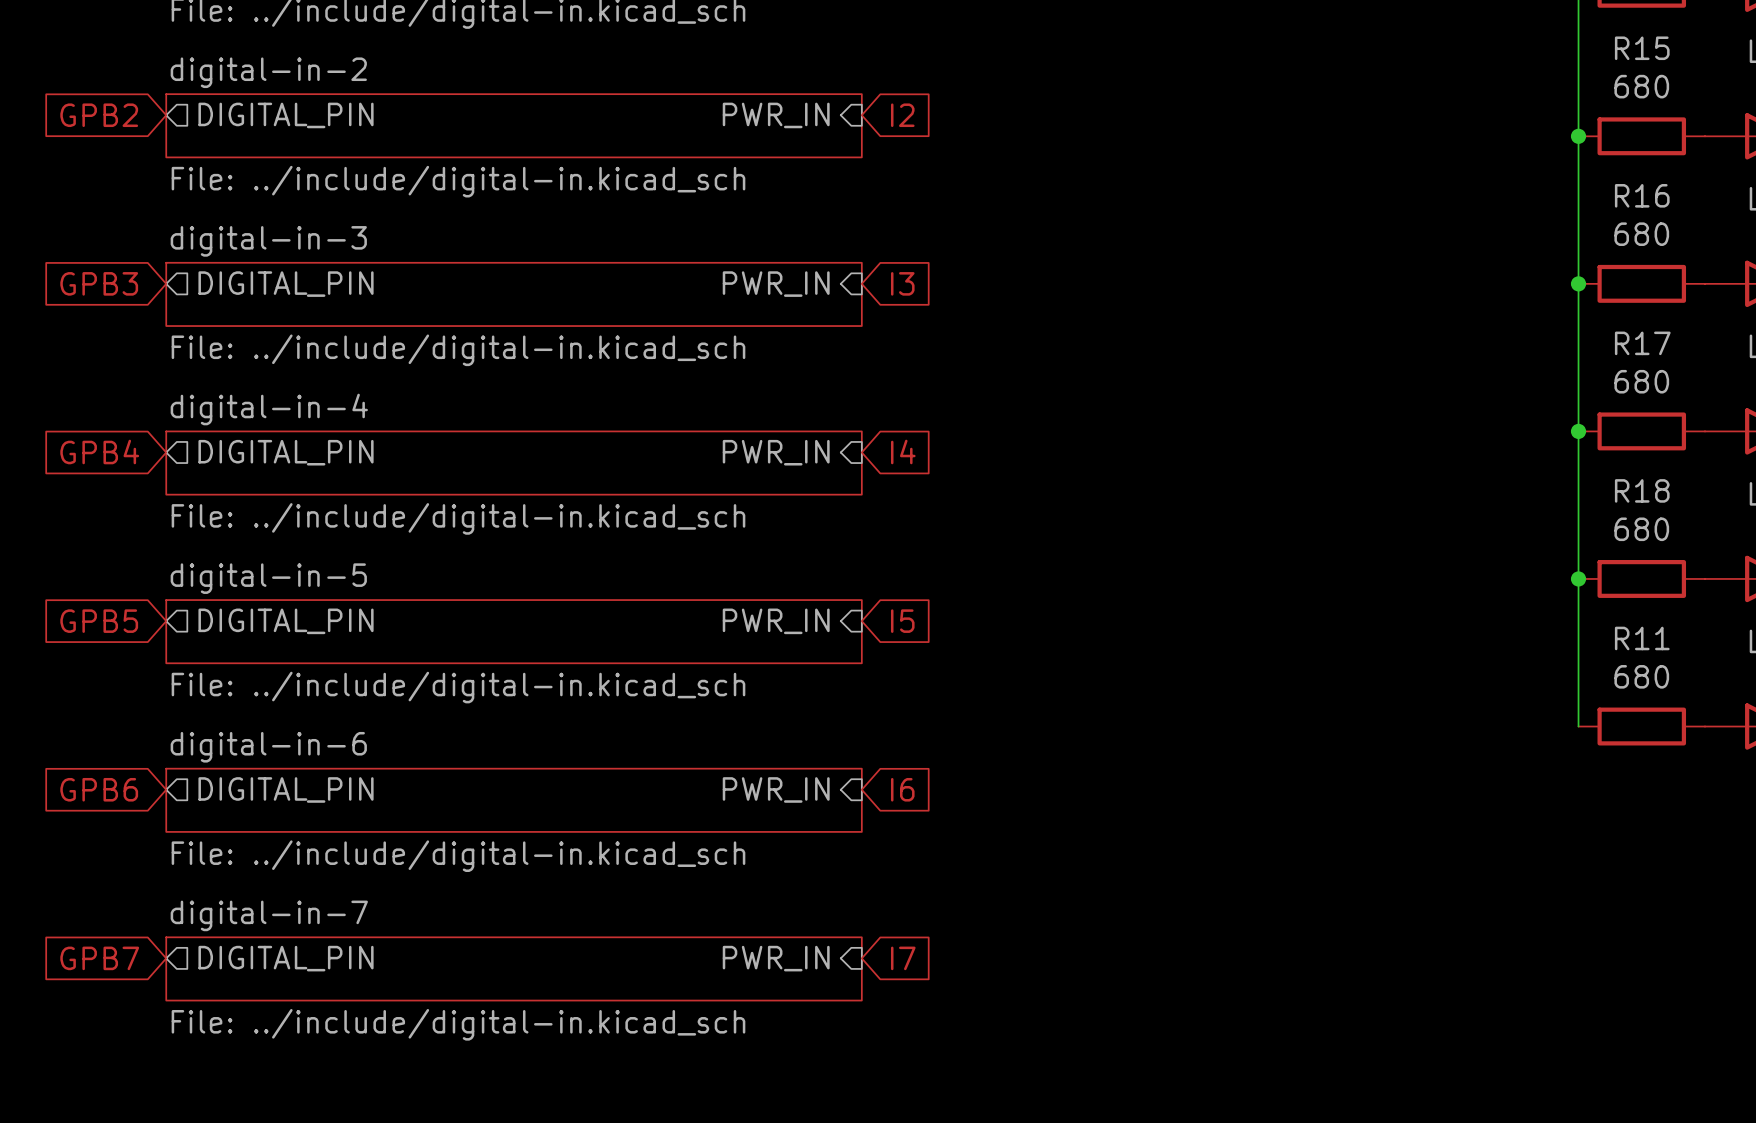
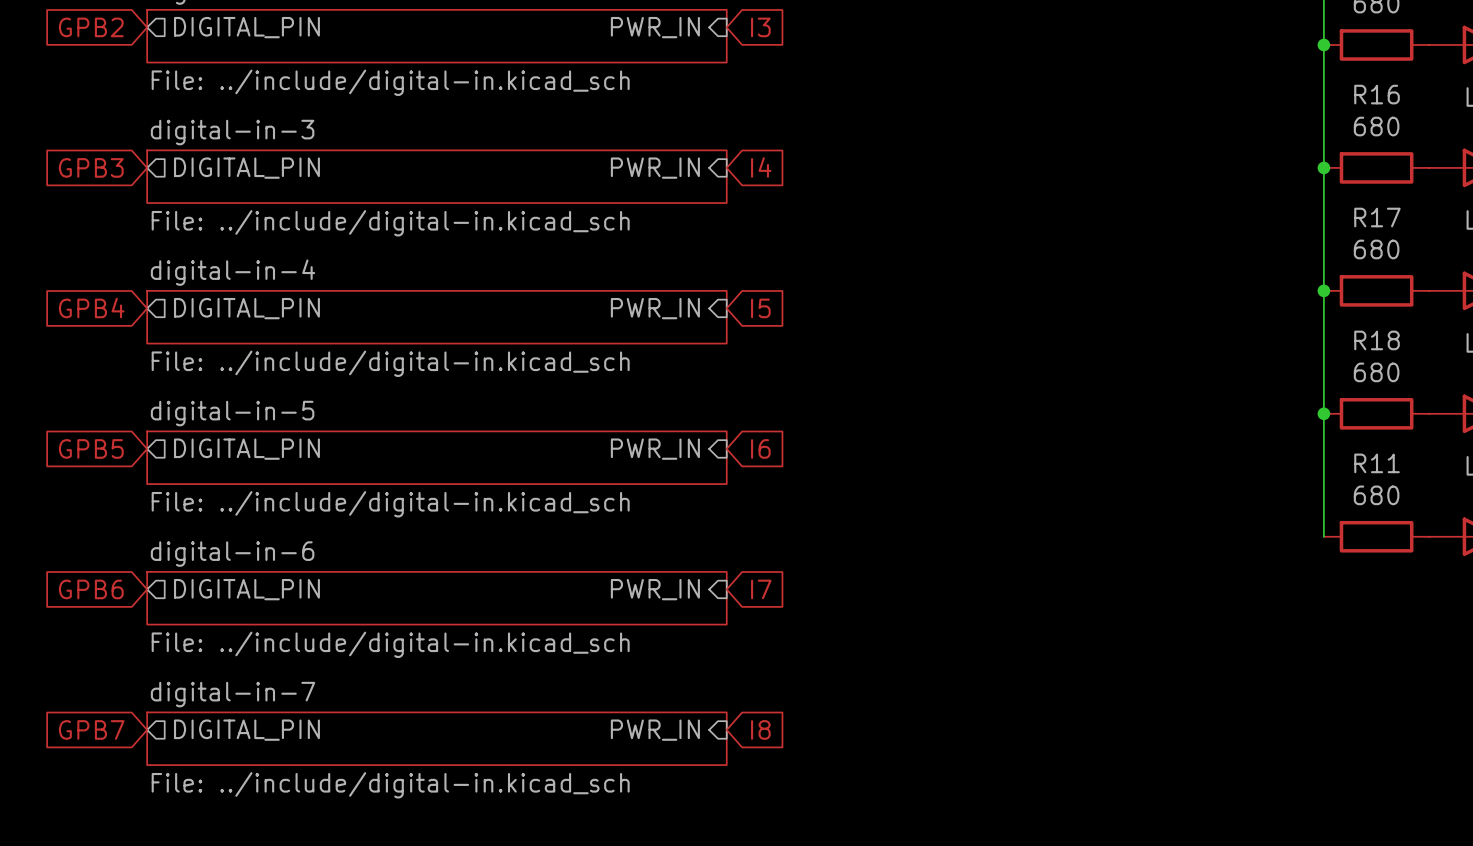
global label: I2 (902, 115) -> I3 (760, 27)
global label: I3 (902, 283) -> I4 (761, 167)
global label: I4 (903, 451) -> I5 (760, 308)
global label: I5 (902, 621) -> I6 (760, 448)
global label: I6 (902, 789) -> I7 (761, 589)
global label: I7 (903, 958) -> I8 (760, 729)

